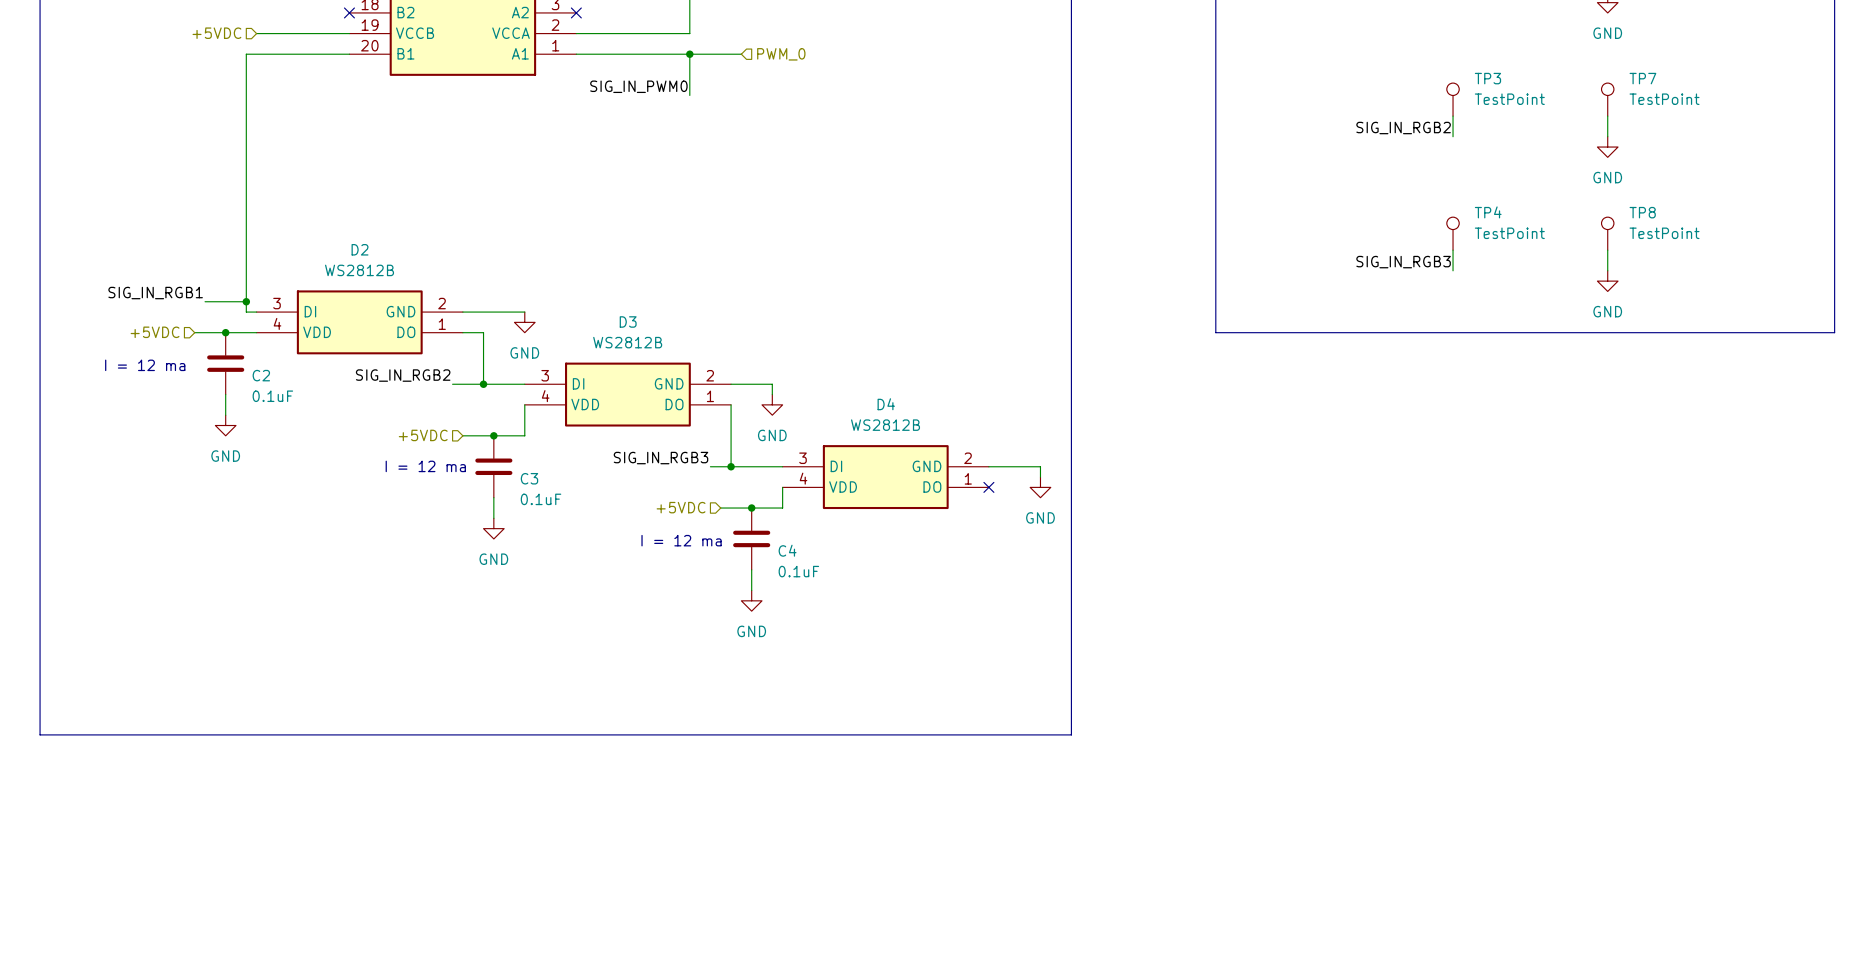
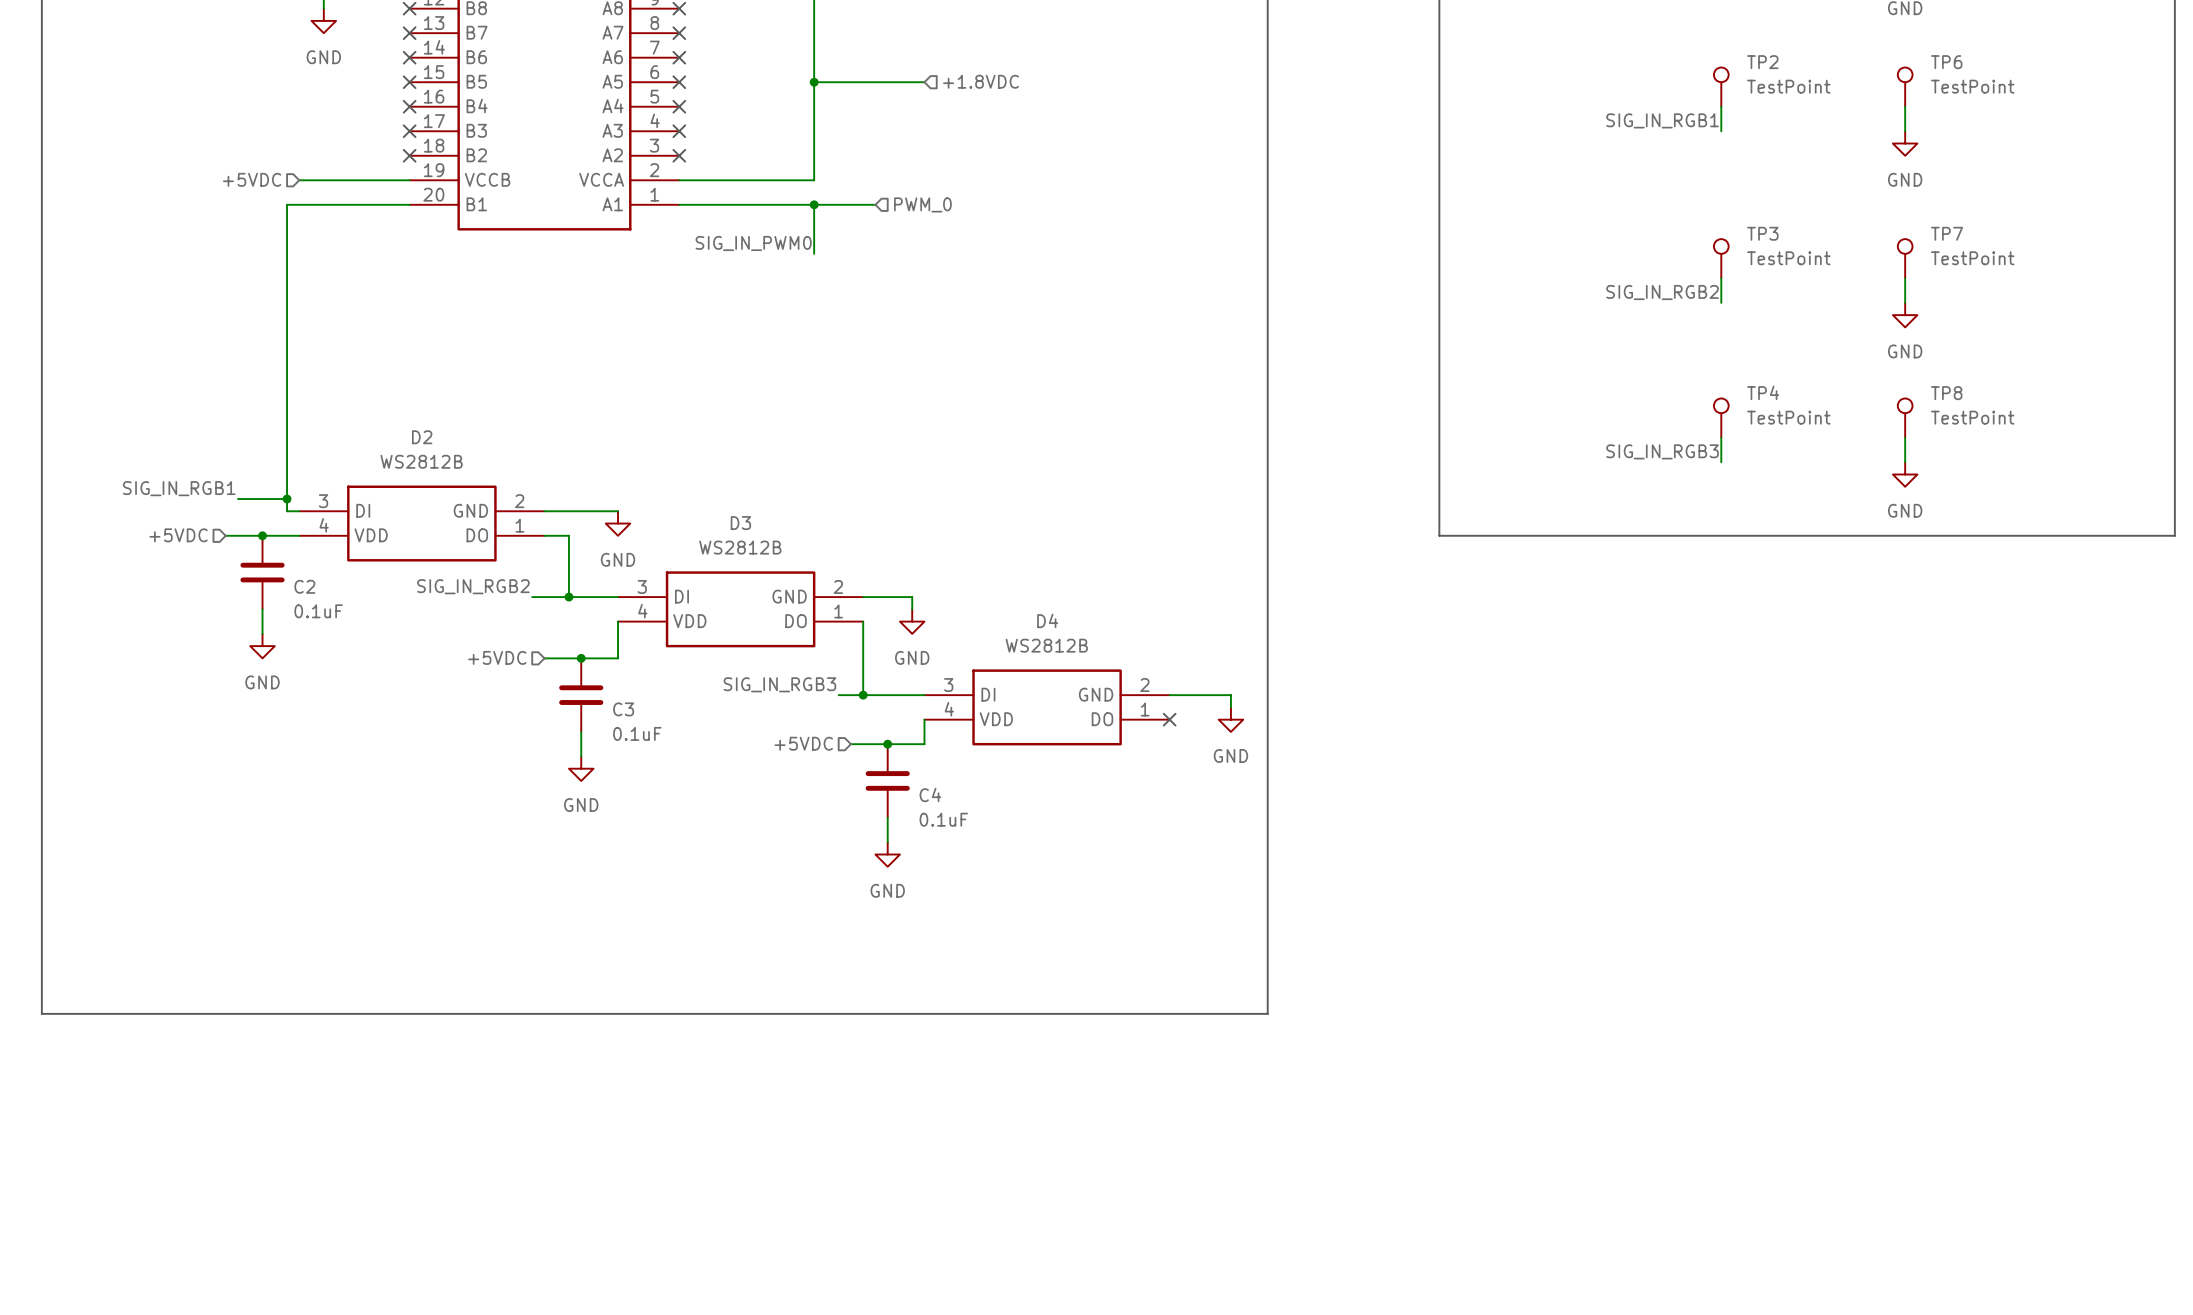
text: I = 12 ma (145, 365) -> none
text: I = 12 ma (425, 466) -> none
text: I = 12 ma (681, 540) -> none

